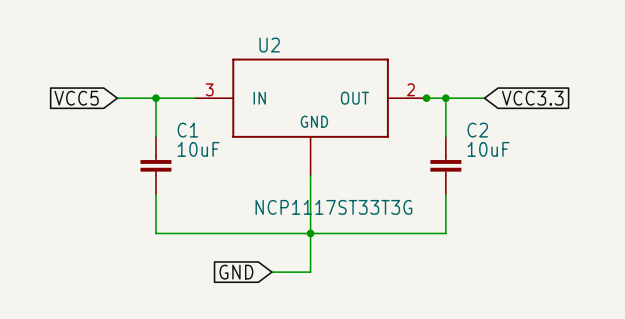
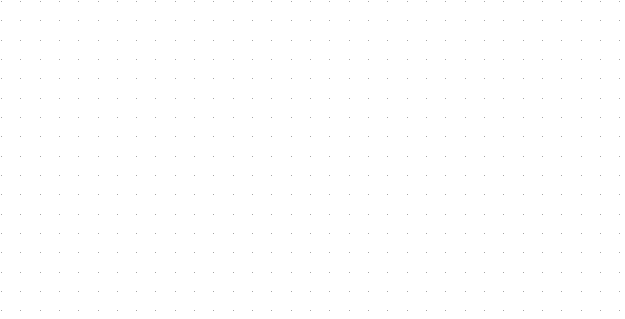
global label: VCC5 (76, 98) -> none
wire: (117, 98) (194, 98) -> none
wire: (155, 98) (155, 136) -> none
junction: (155, 98) -> none
wire: (426, 98) (484, 98) -> none
junction: (426, 98) -> none
wire: (445, 98) (445, 136) -> none
junction: (445, 98) -> none
global label: VCC3.3 (532, 98) -> none
U2: NCP1117ST33T3G (310, 117) -> none
C1: 10uF (155, 165) -> none
C2: 10uF (445, 165) -> none
wire: (310, 175) (310, 272) (271, 272) -> none
wire: (155, 194) (155, 233) (445, 233) (445, 194) -> none
junction: (310, 233) -> none
global label: GND (236, 272) -> none

